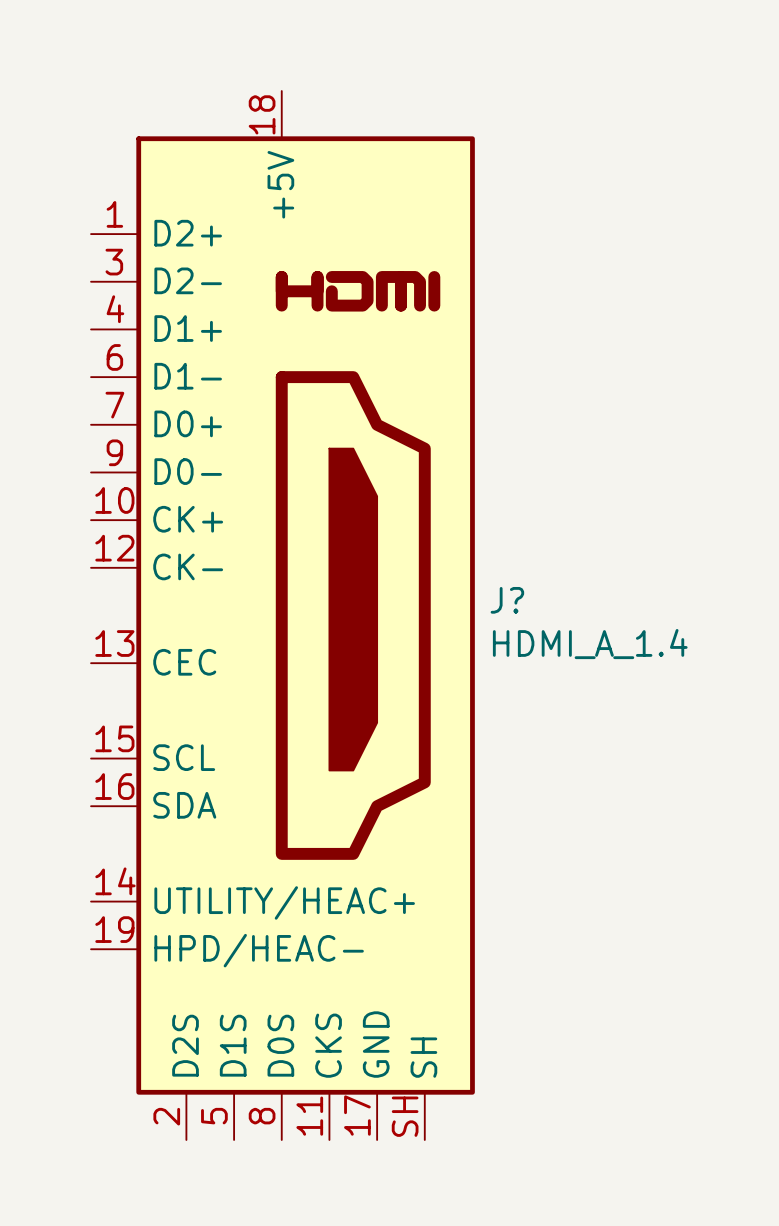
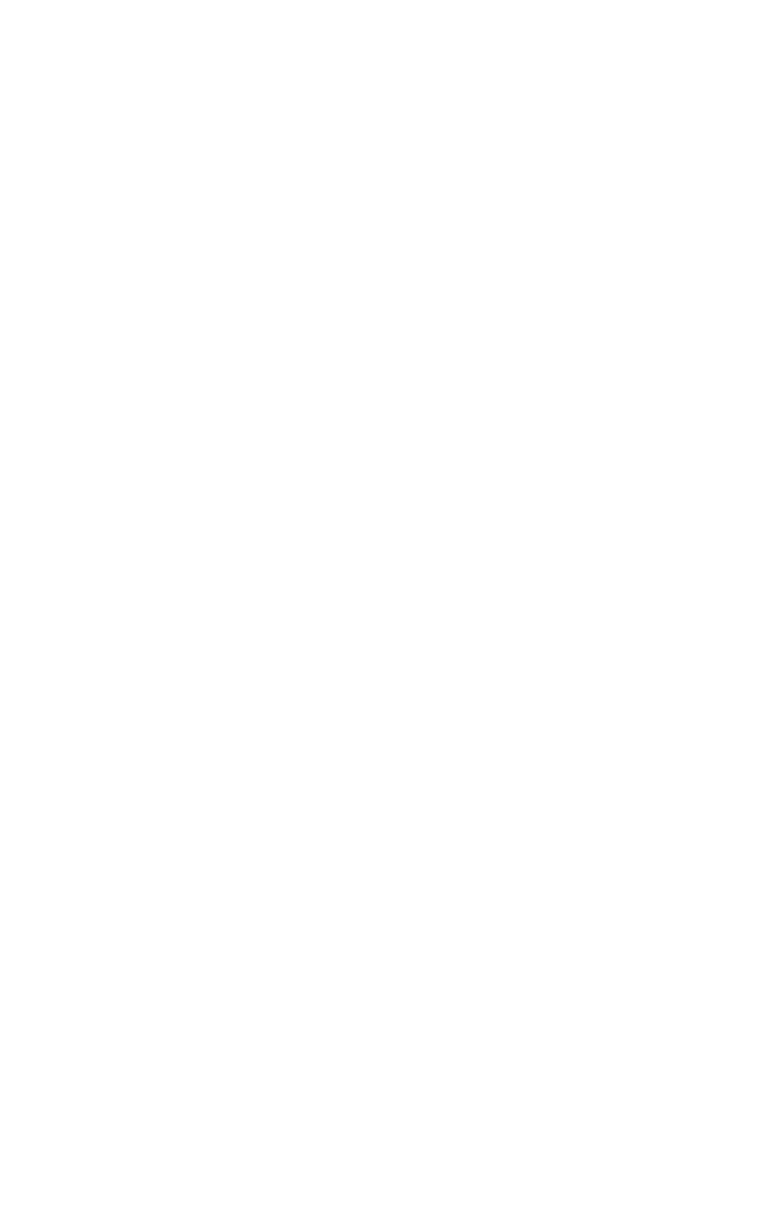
J?: HDMI_A_1.4 (282, 615) -> none

